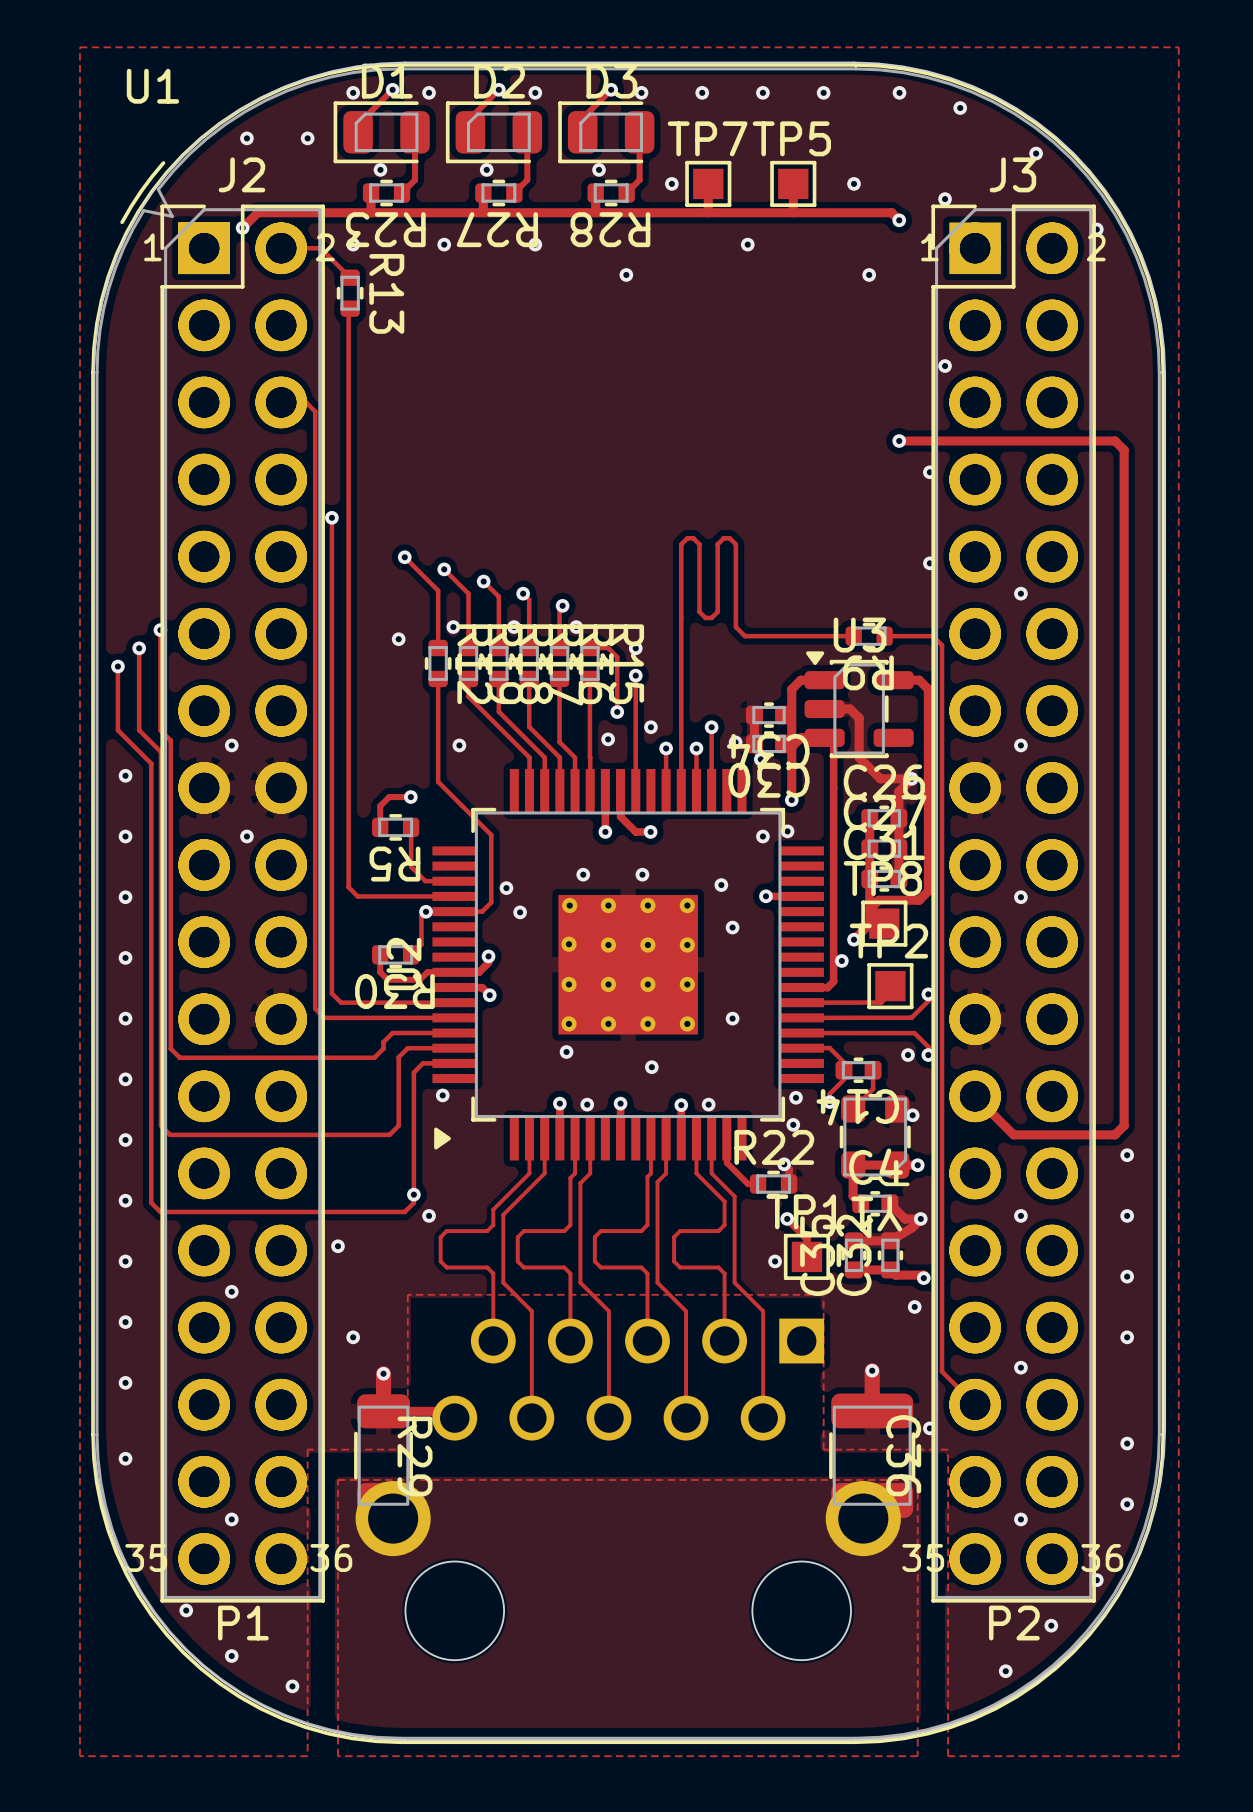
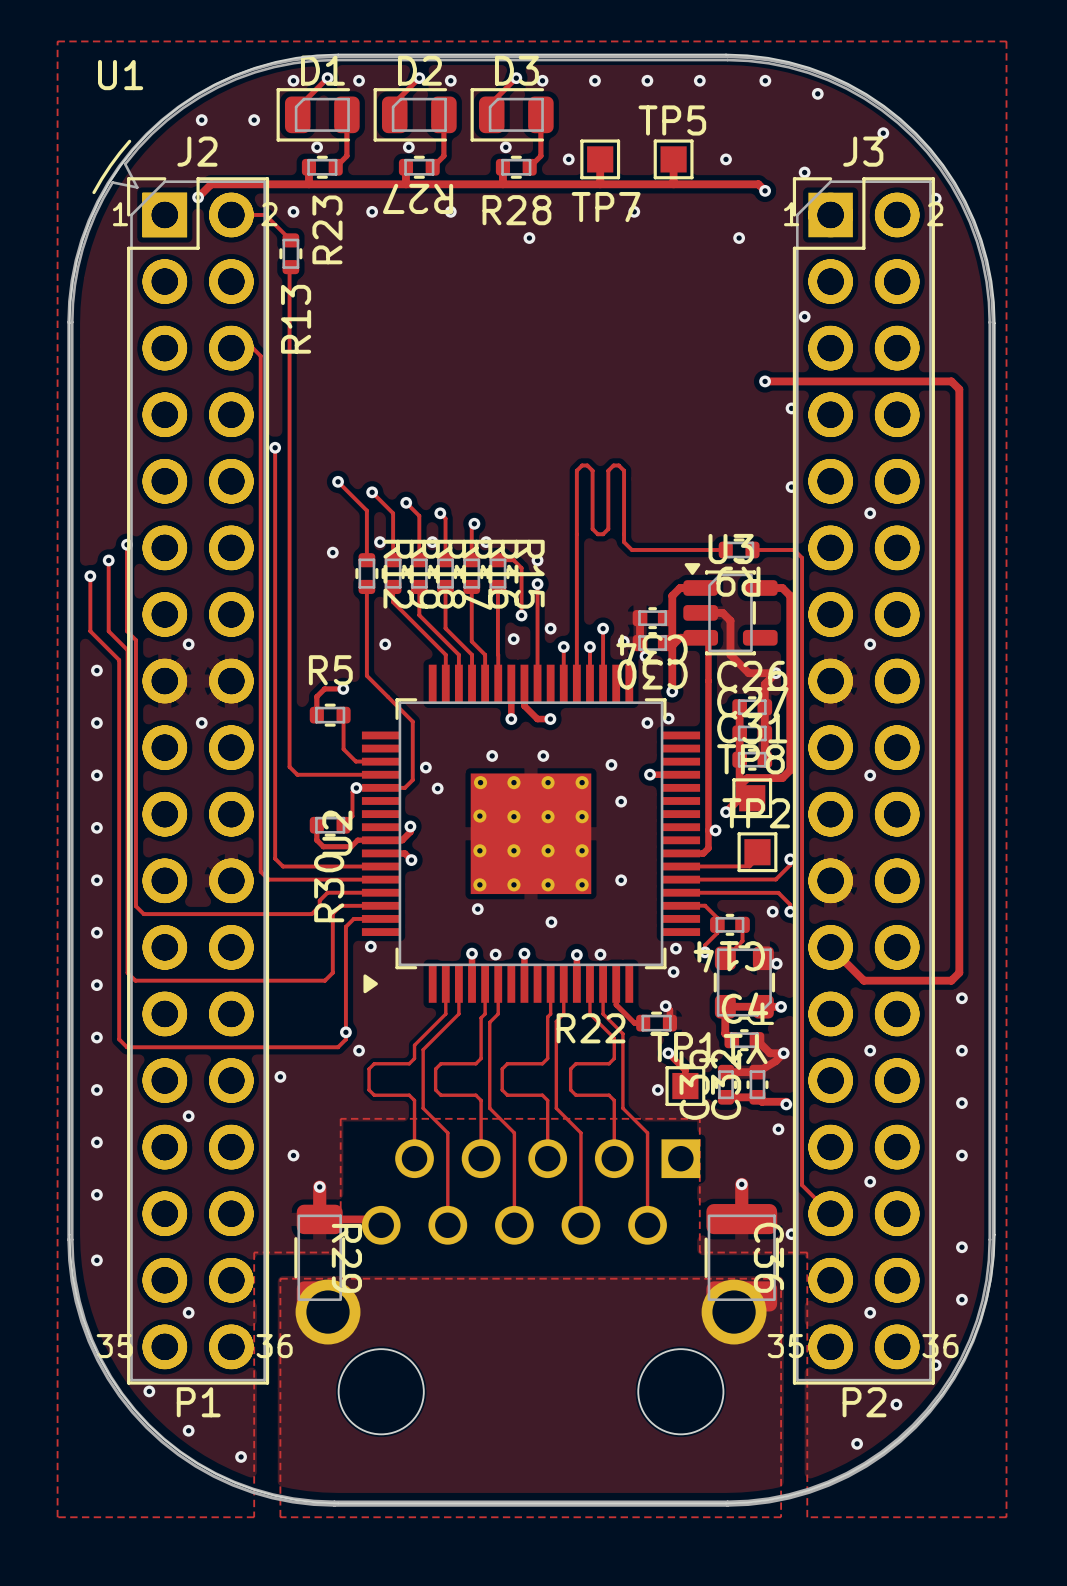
U1 footprint: [91, 63, 1166, 1745] -> [67, 55, 995, 1507]
TP7 name position: TP7 (707, 138) -> TP7 (606, 207)
R23 name rotation: 0° (385, 229) -> 90° clockwise (327, 229)
R28 name rotation: 0° (610, 229) -> 180° (516, 210)
R13 name rotation: 0° (386, 293) -> 180° (296, 319)
R5 name rotation: 0° (394, 864) -> 180° (330, 670)
R5 name position: R5 (394, 864) -> R5 (330, 670)
R30 name rotation: 0° (394, 991) -> 90° clockwise (329, 887)
R22 name position: R22 (774, 1147) -> R22 (591, 1028)

